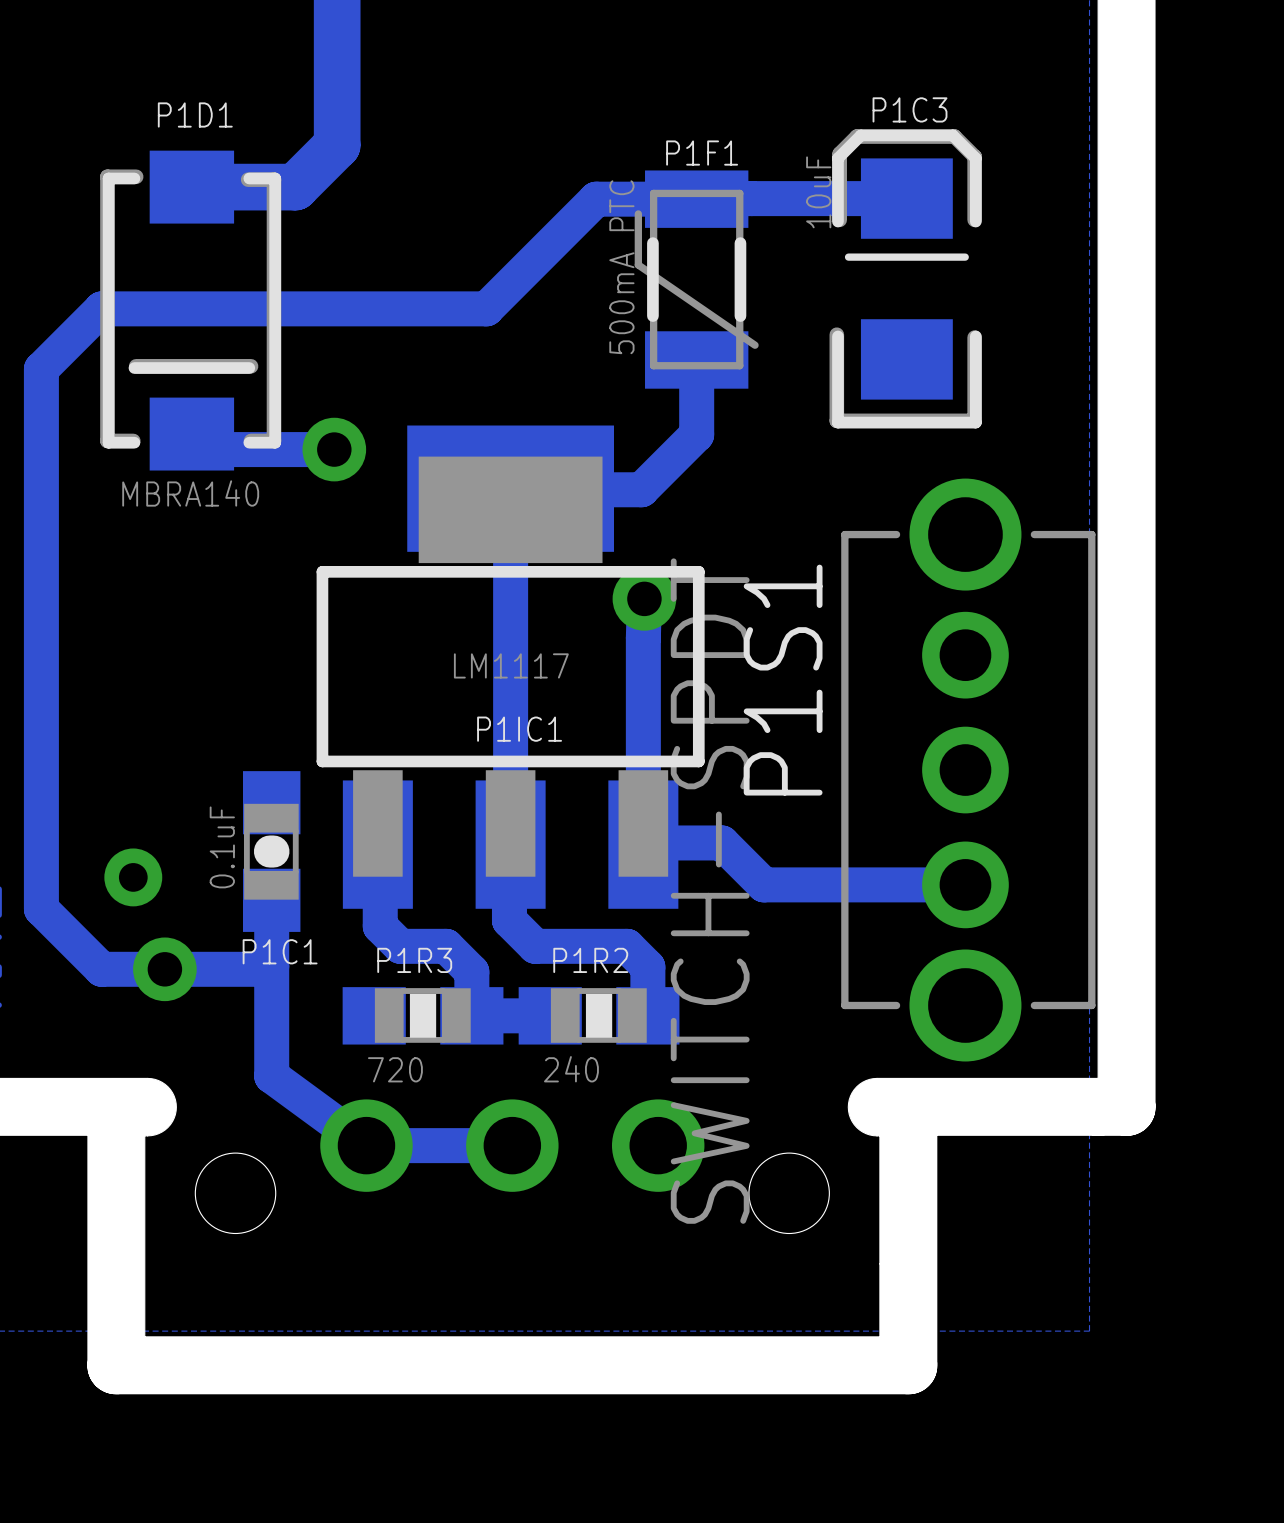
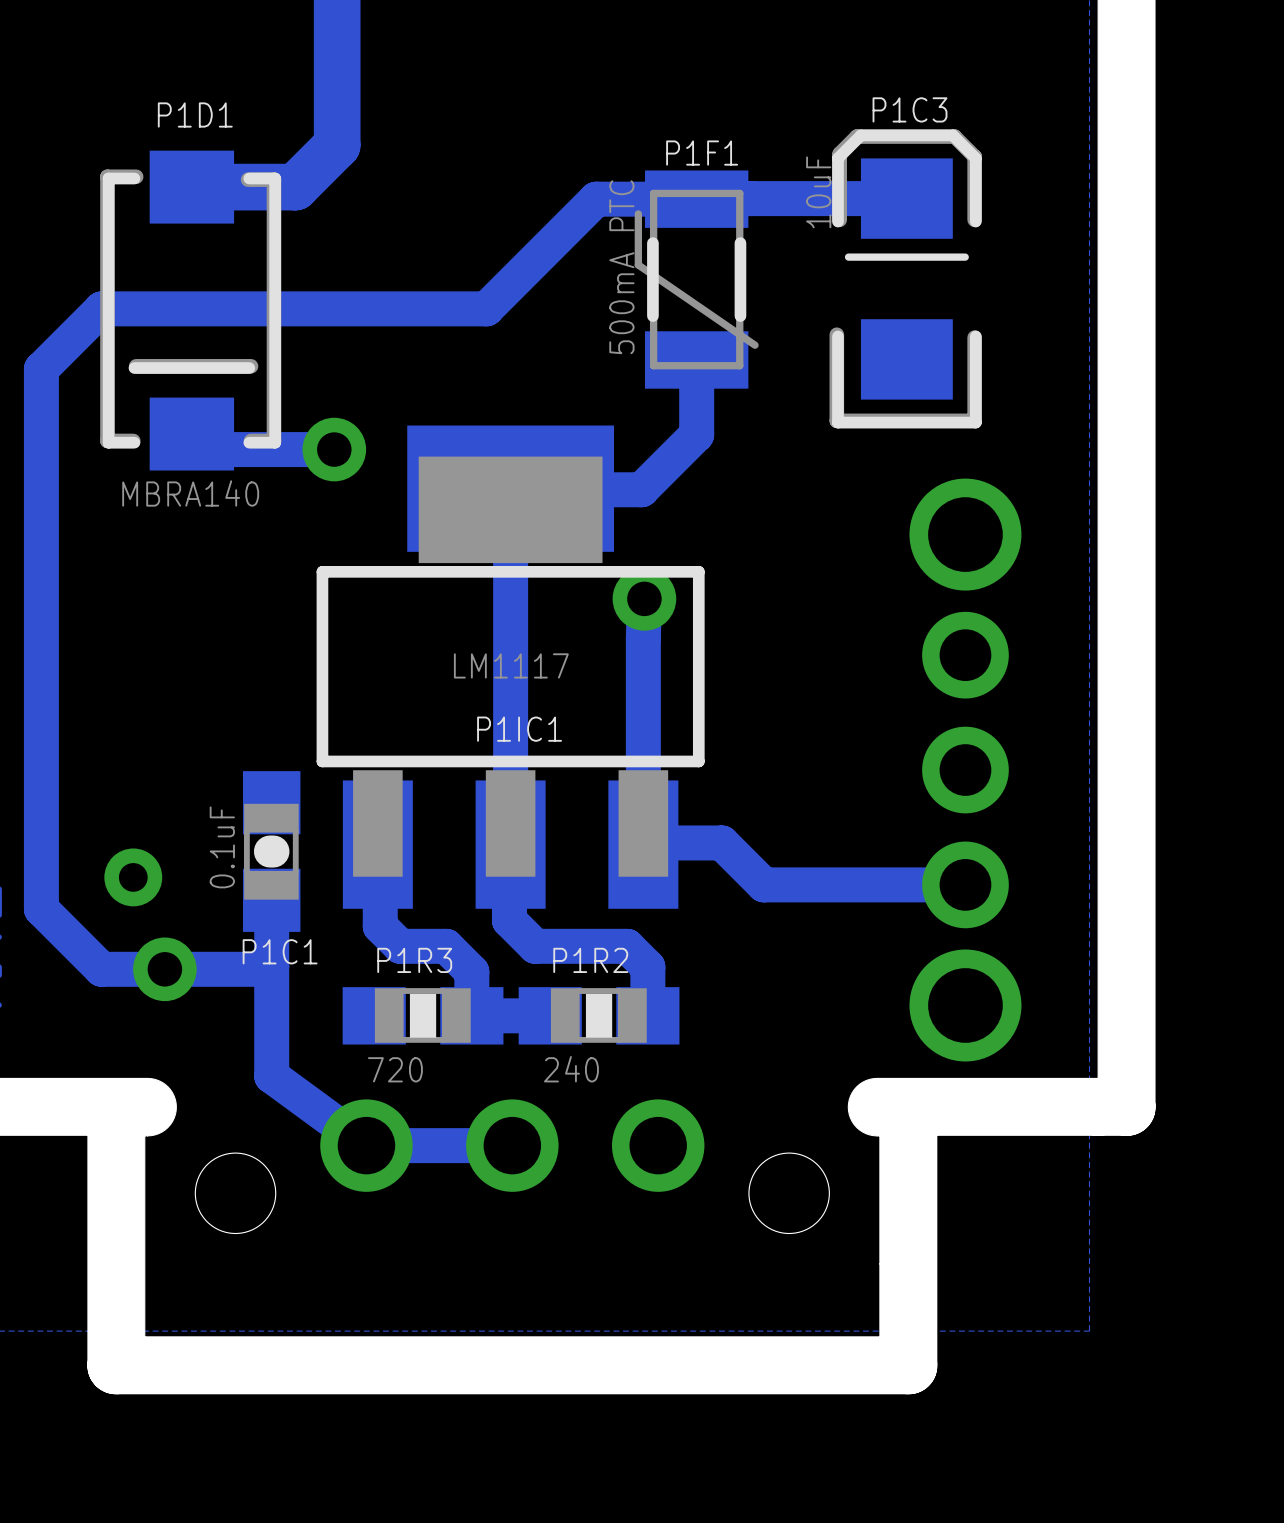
P1S1: SWITCH-SPDT (968, 770) -> none

